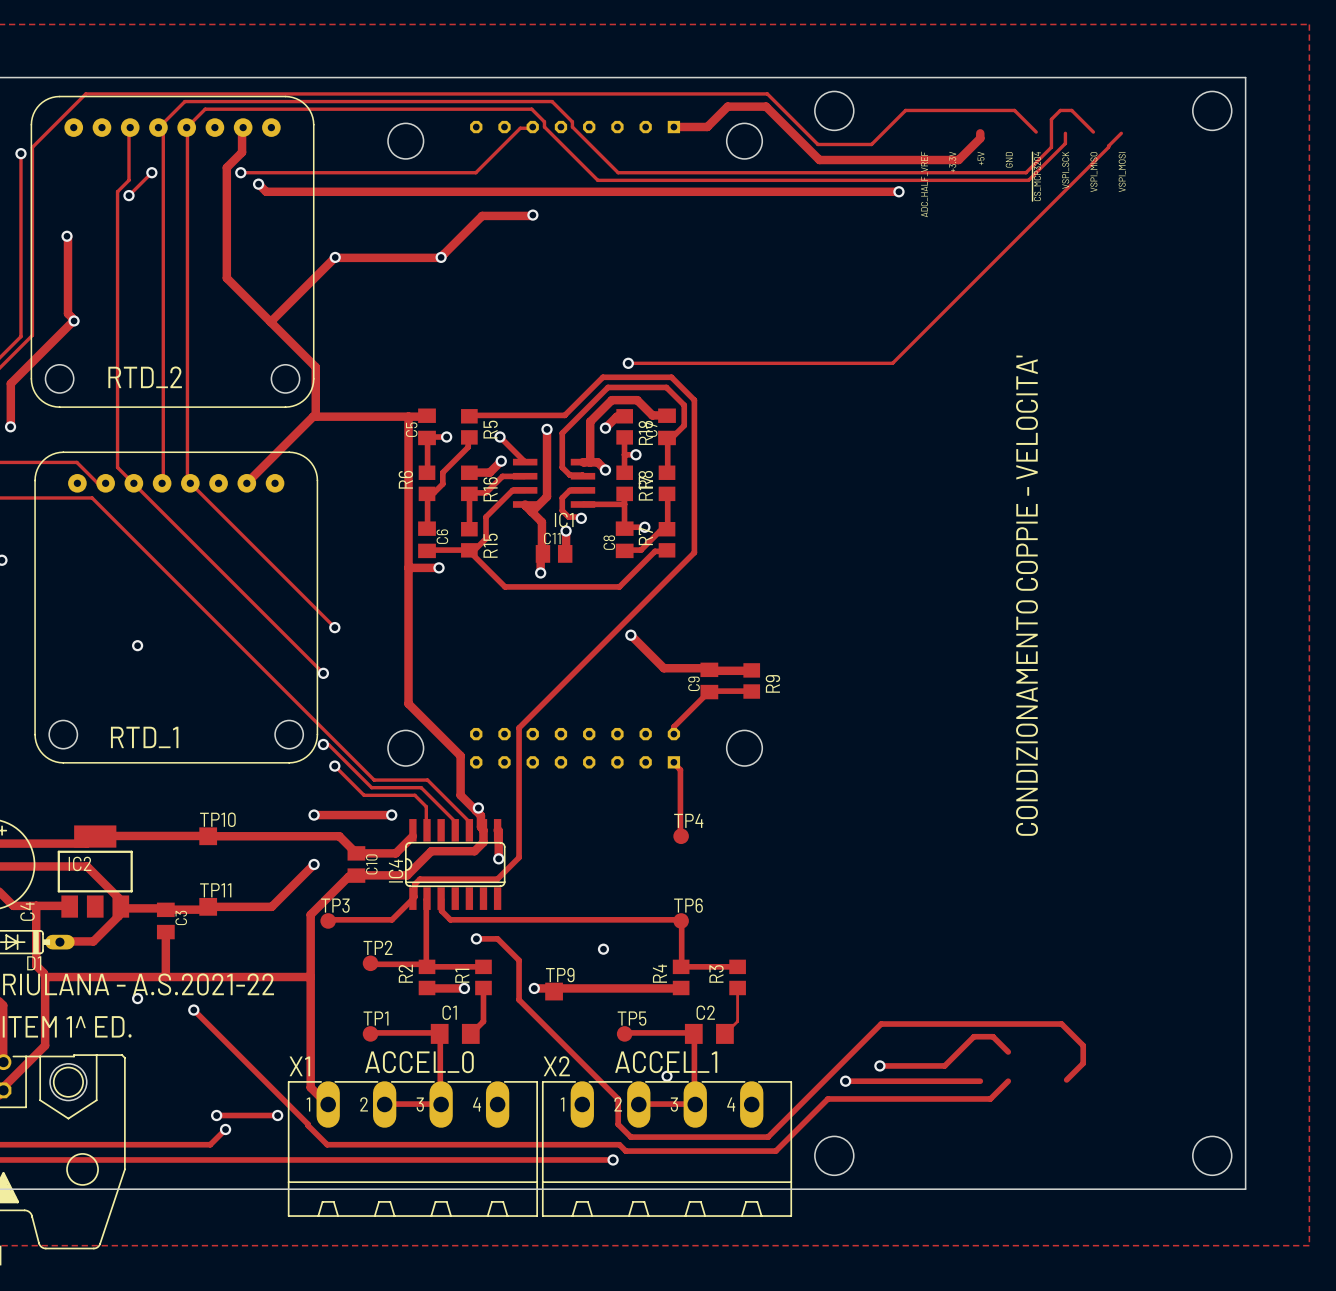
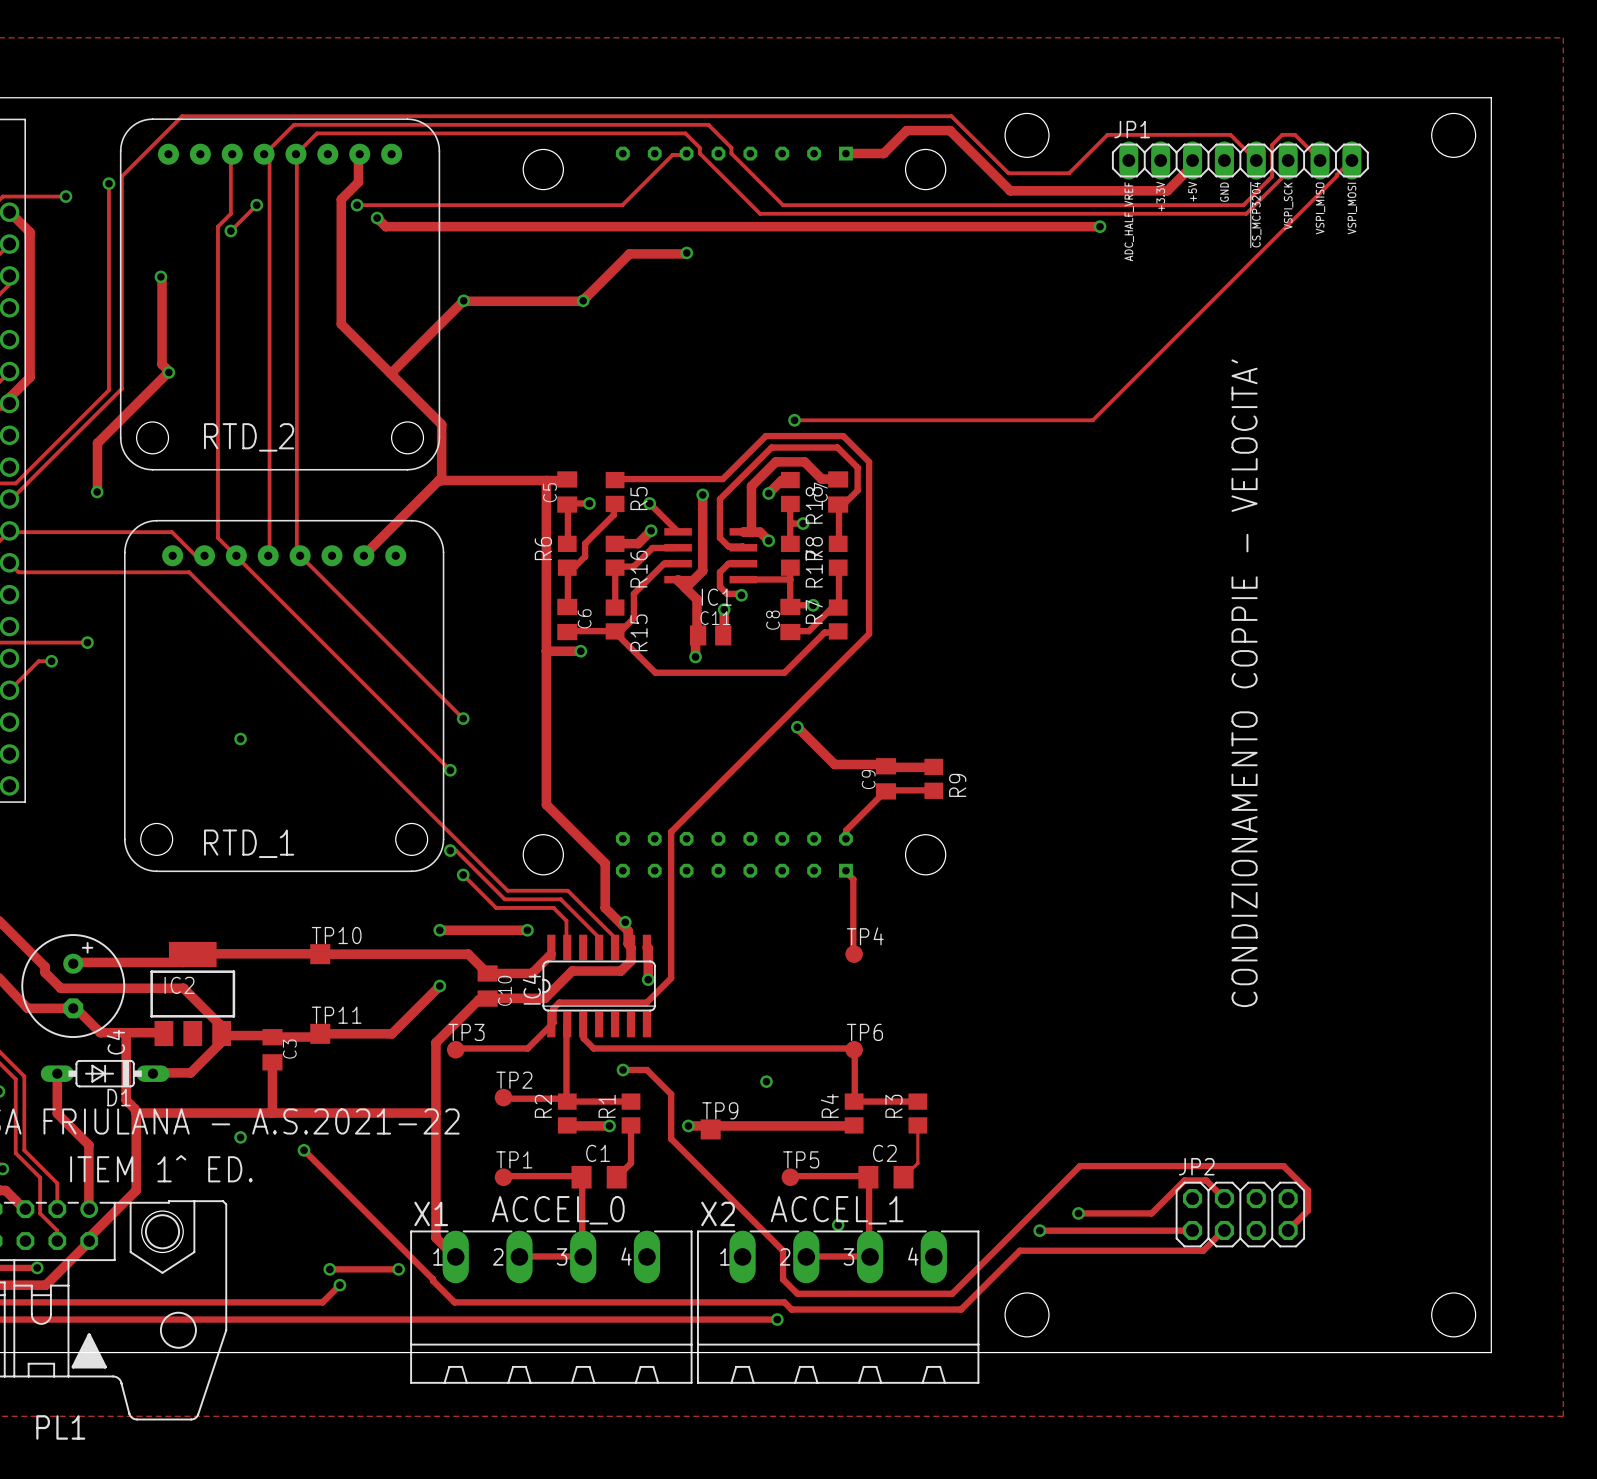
JP1: none -> (1240, 160)
JP2: none -> (1240, 1214)

